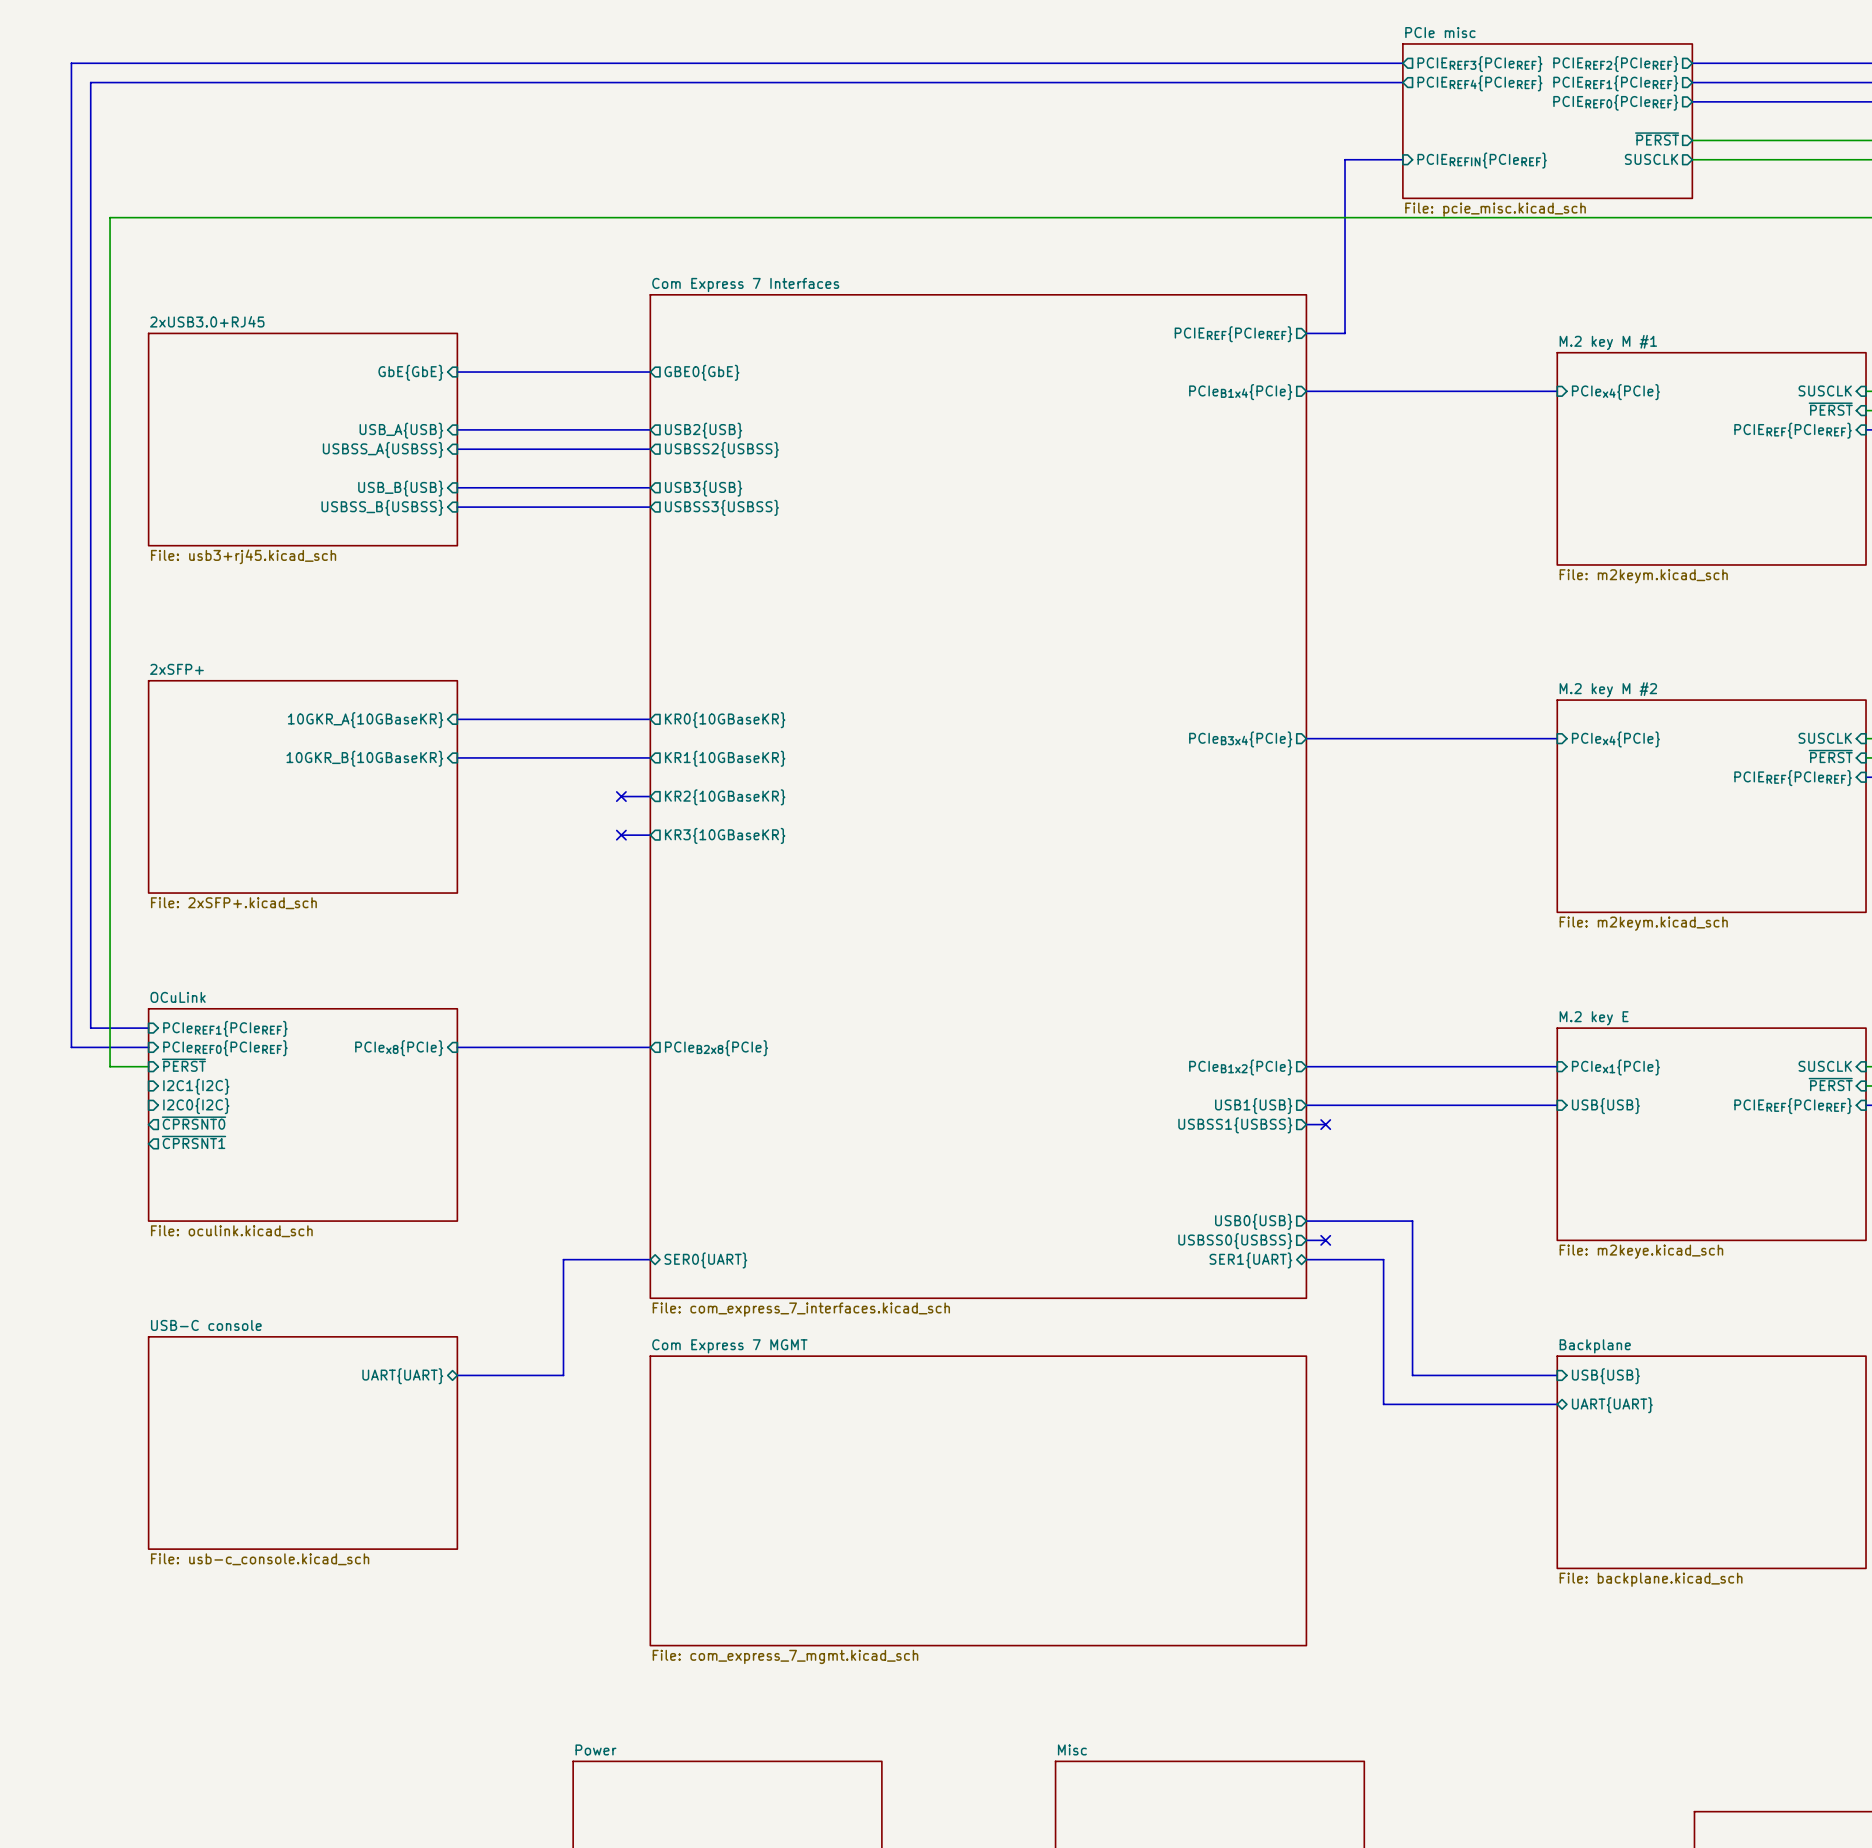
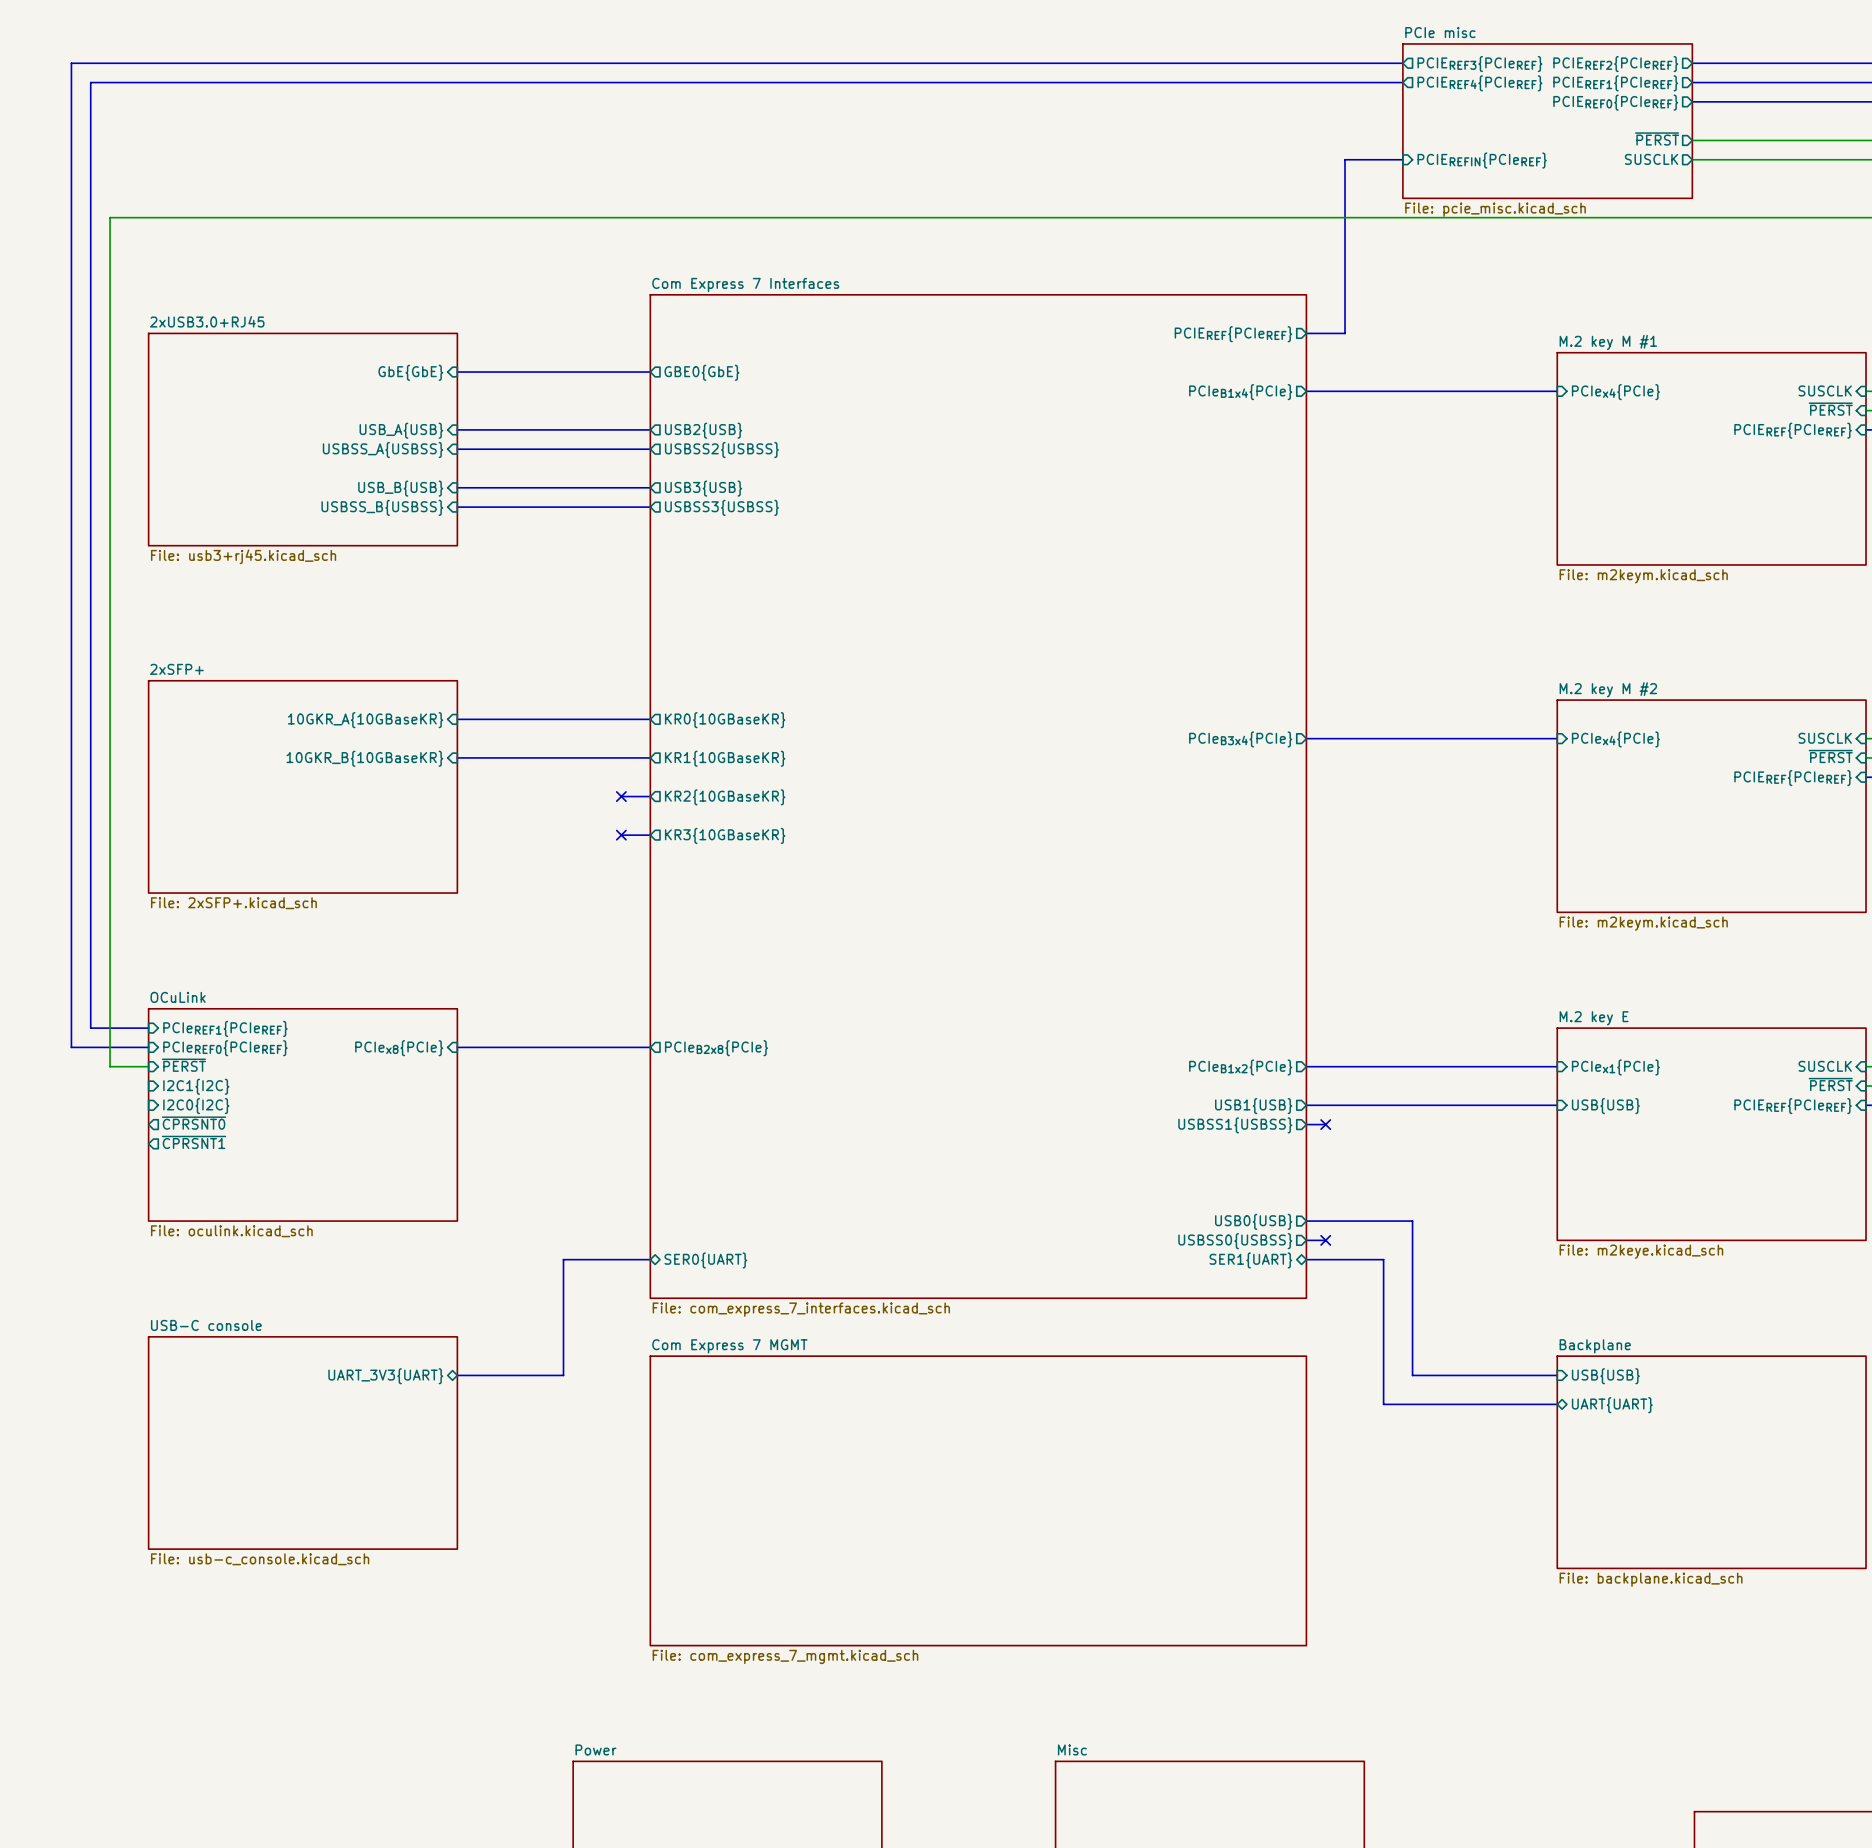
sheet pin: UART{UART} (402, 1376) -> UART_3V3{UART} (385, 1376)

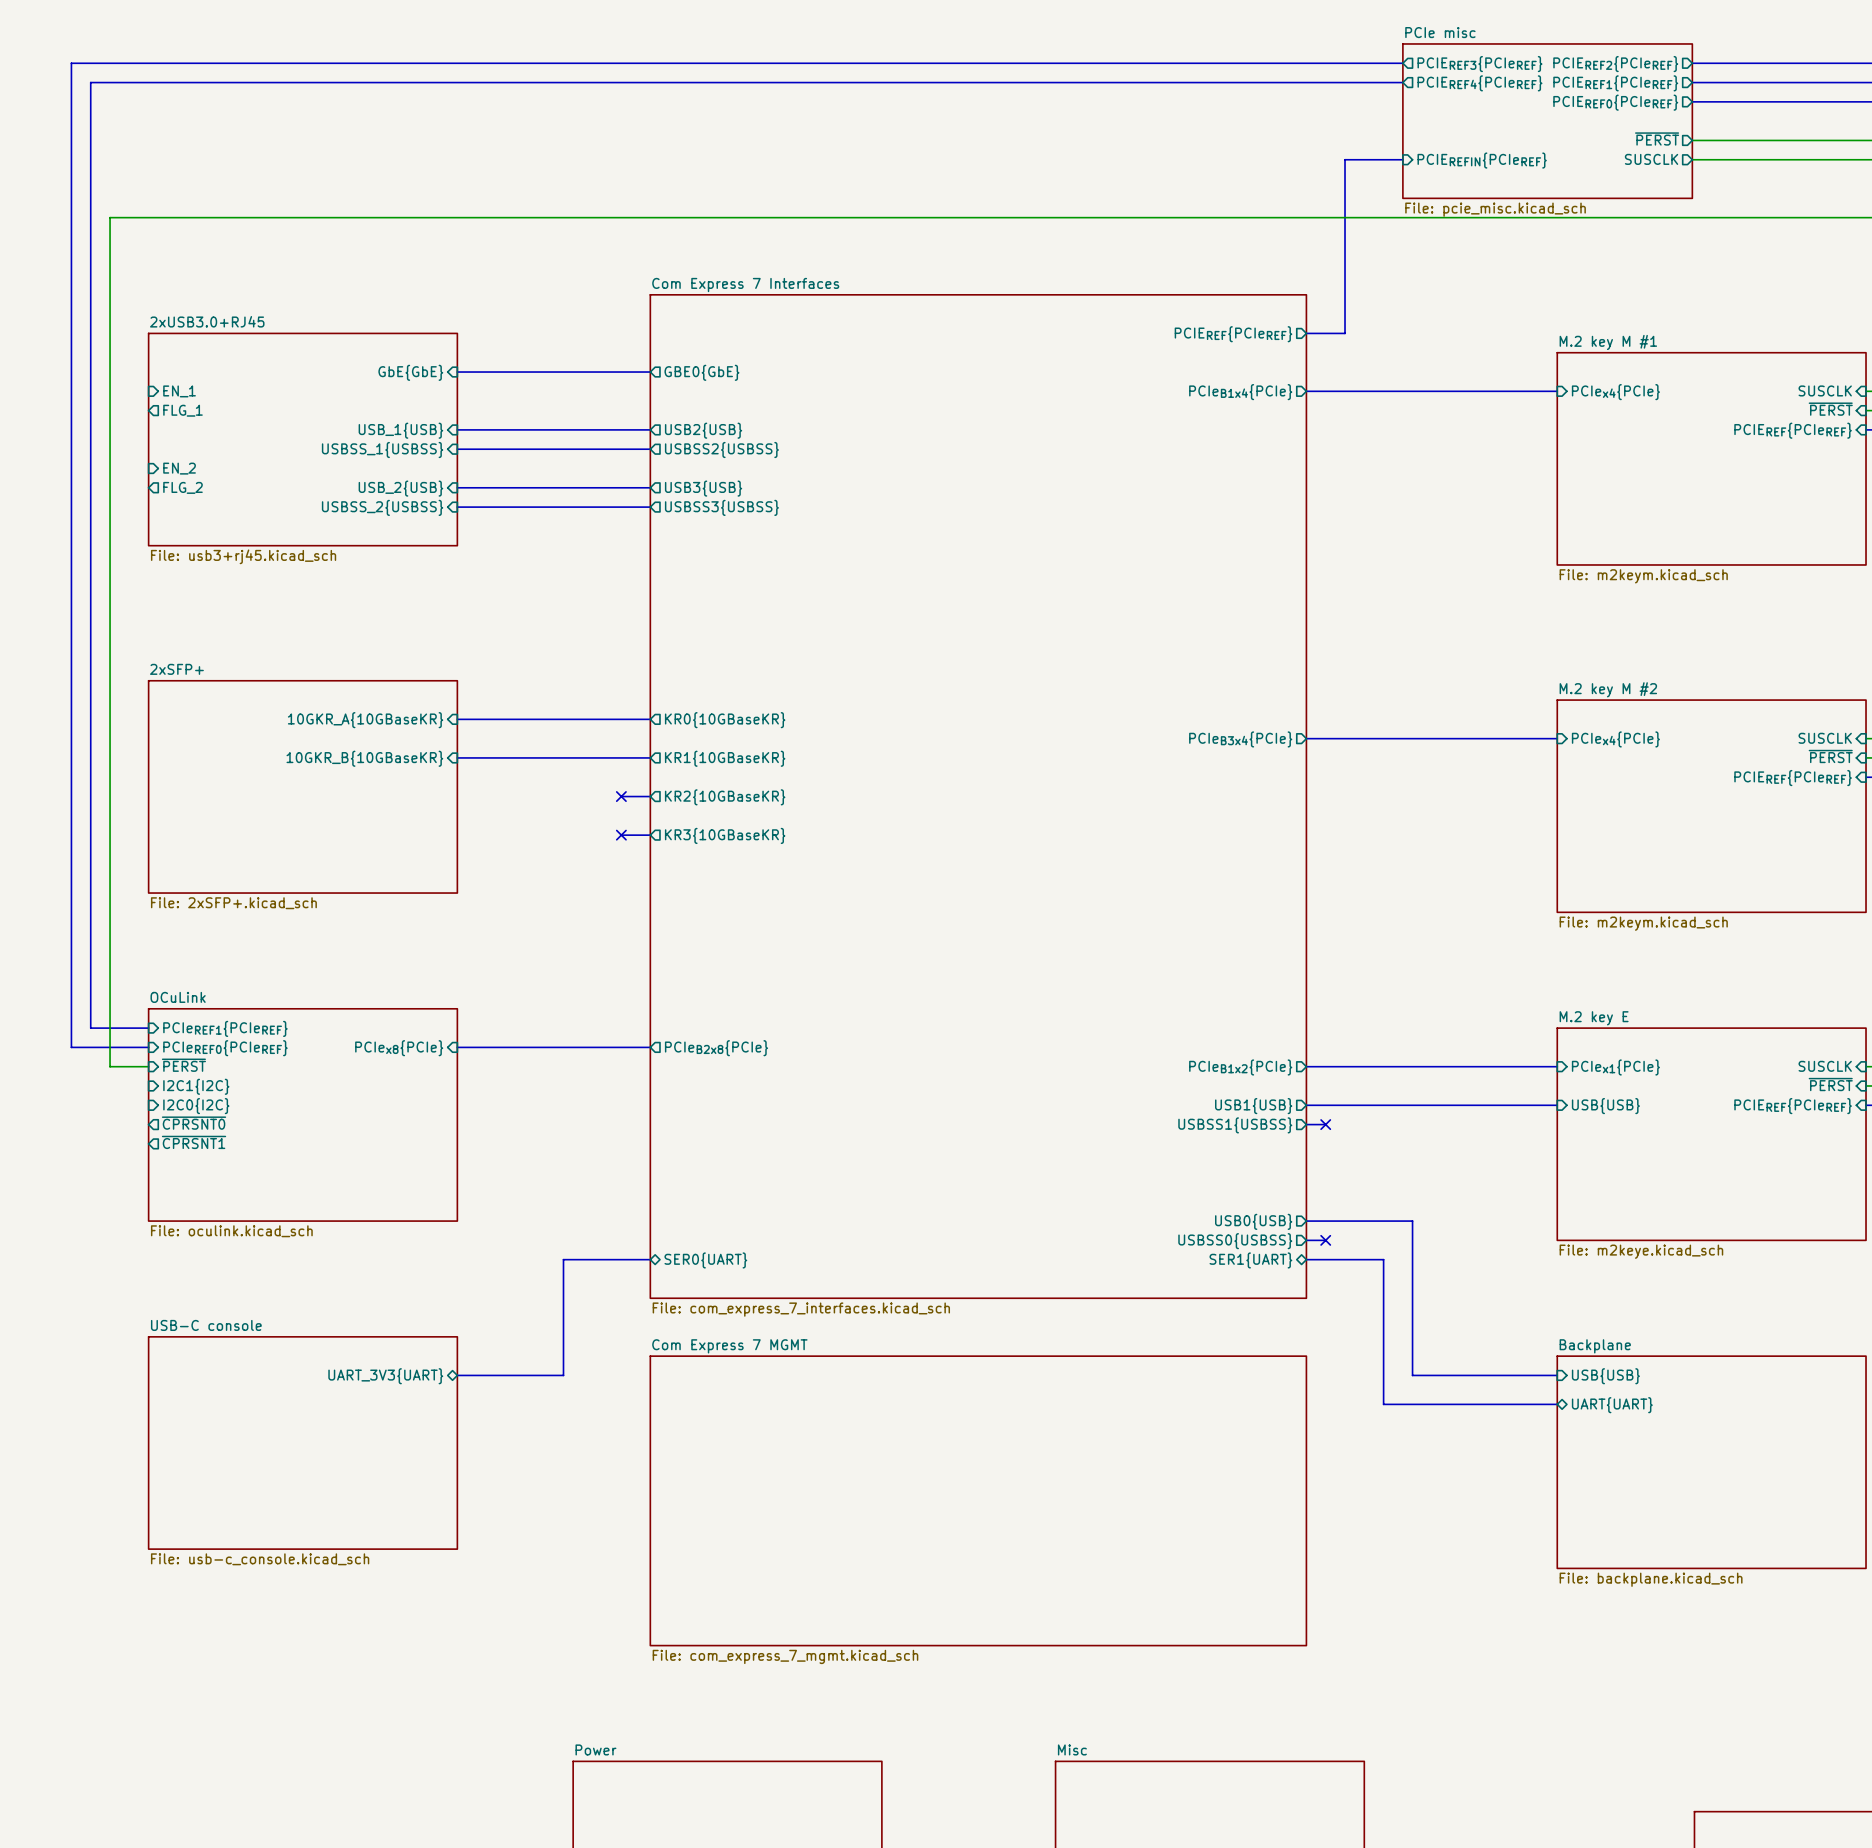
sheet pin: none -> EN_1 (179, 391)
sheet pin: none -> FLG_1 (183, 410)
sheet pin: USB_A{USB} (401, 430) -> USB_1{USB} (400, 430)
sheet pin: USBSS_A{USBSS} (383, 449) -> USBSS_1{USBSS} (382, 449)
sheet pin: none -> EN_2 (179, 468)
sheet pin: none -> FLG_2 (183, 487)
sheet pin: USB_B{USB} (400, 488) -> USB_2{USB} (400, 488)
sheet pin: USBSS_B{USBSS} (382, 507) -> USBSS_2{USBSS} (382, 507)

